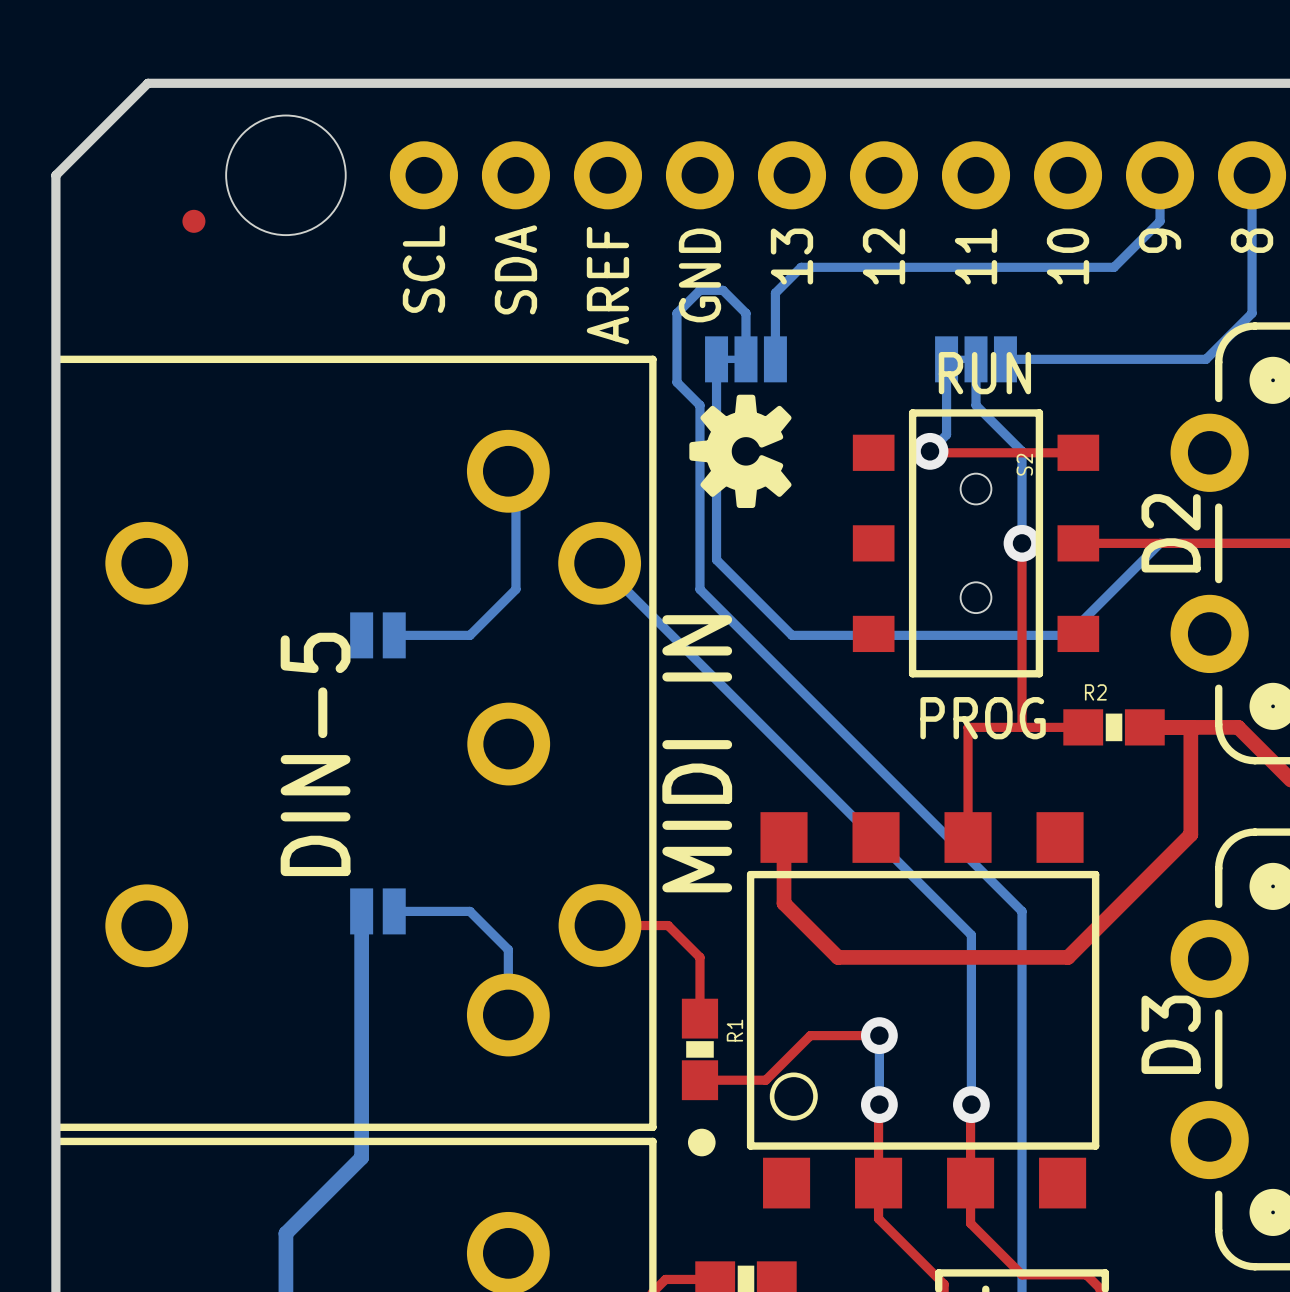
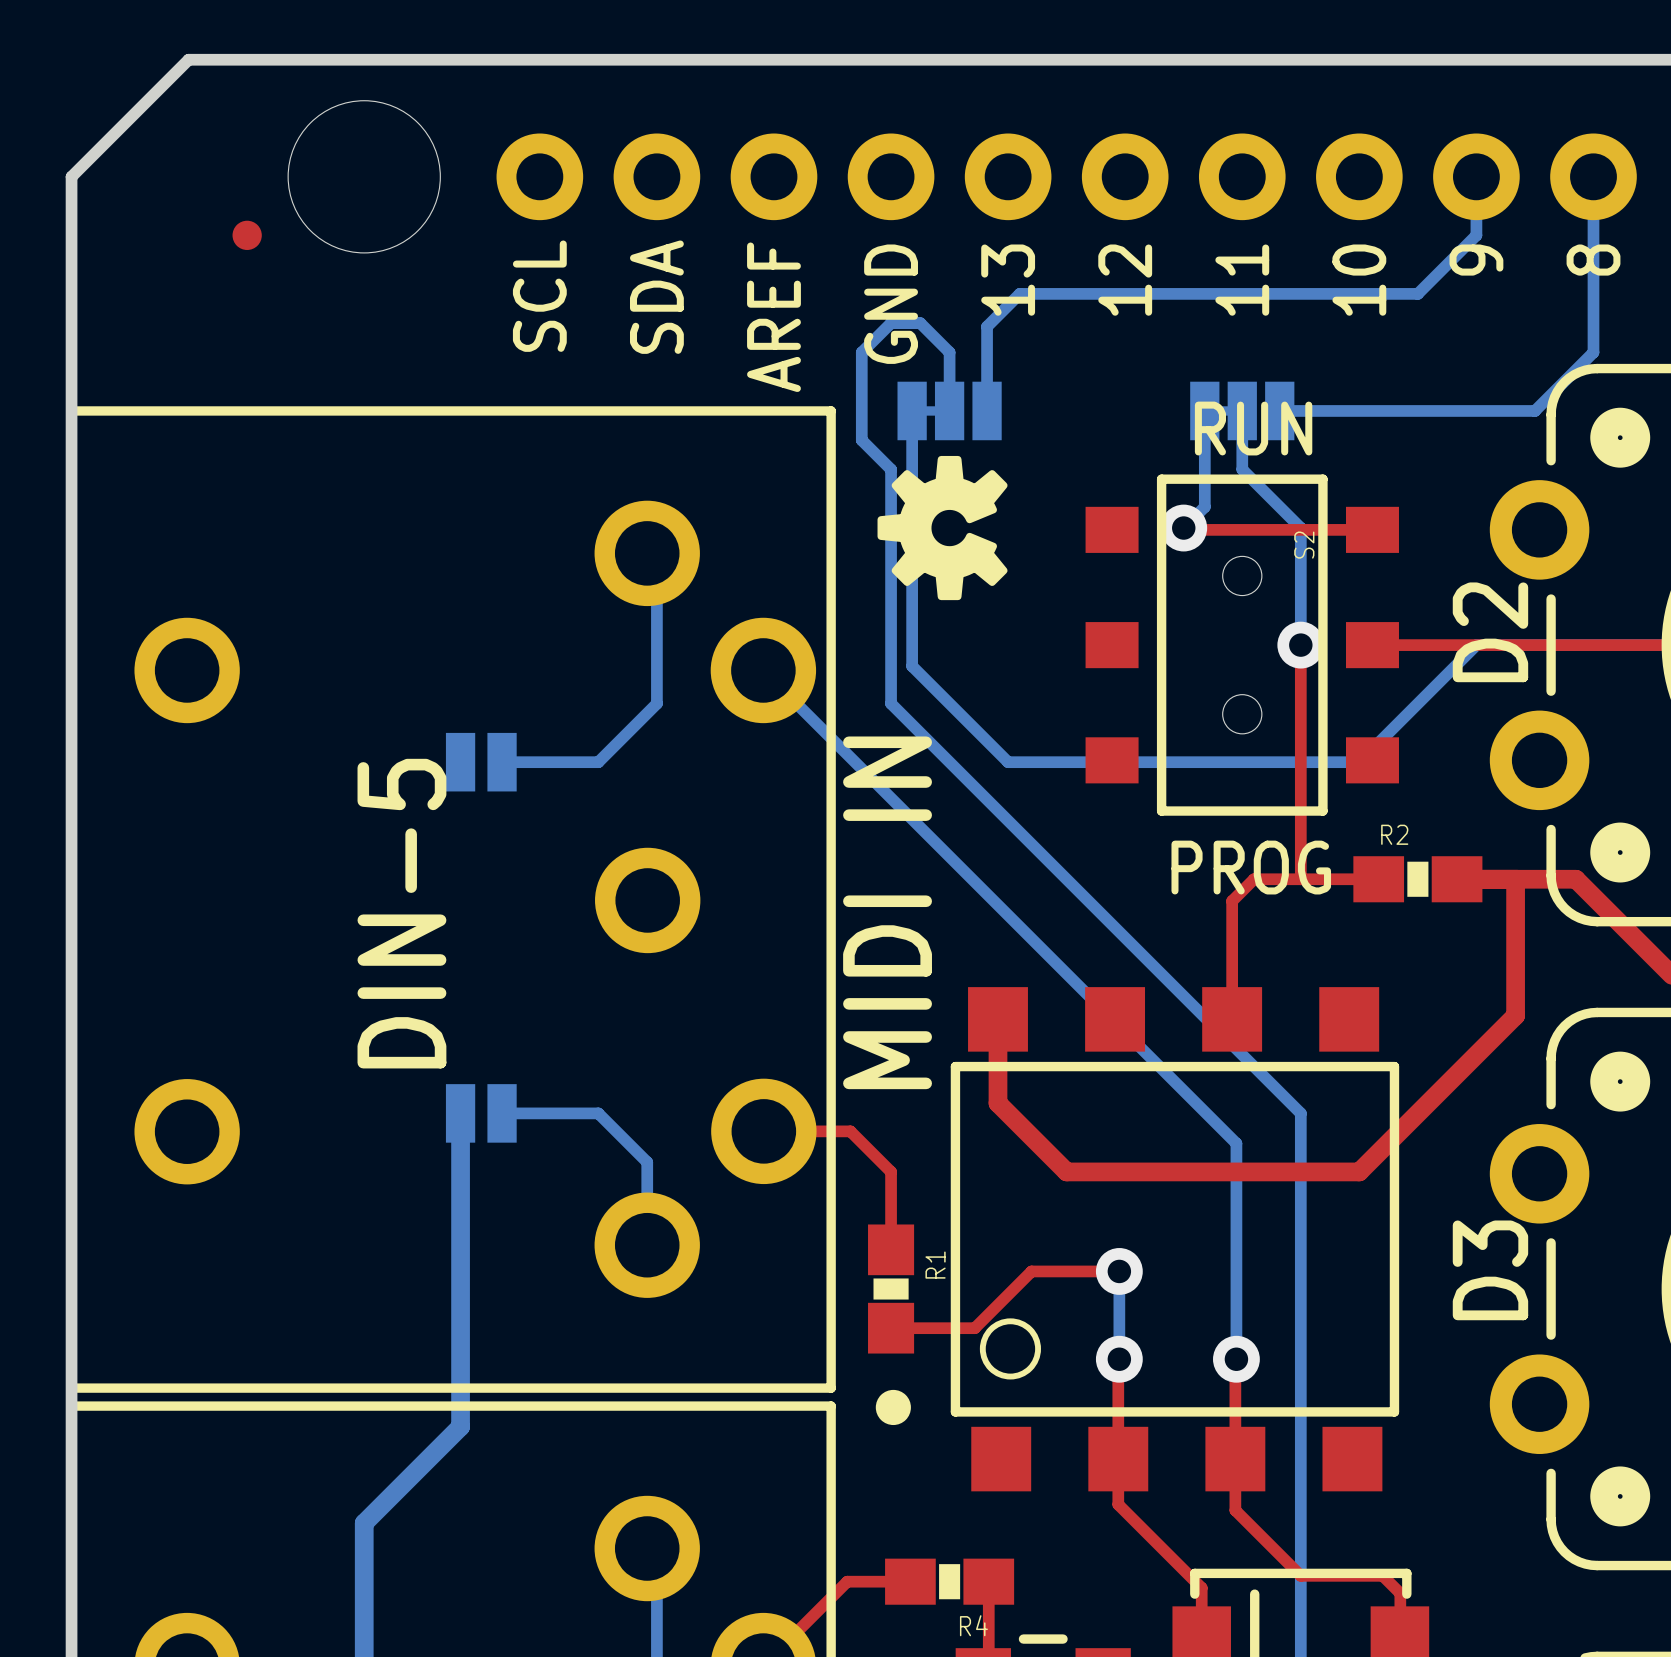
top track: (985, 727) (968, 727) (968, 744) -> (1253, 879) (1232, 901)

